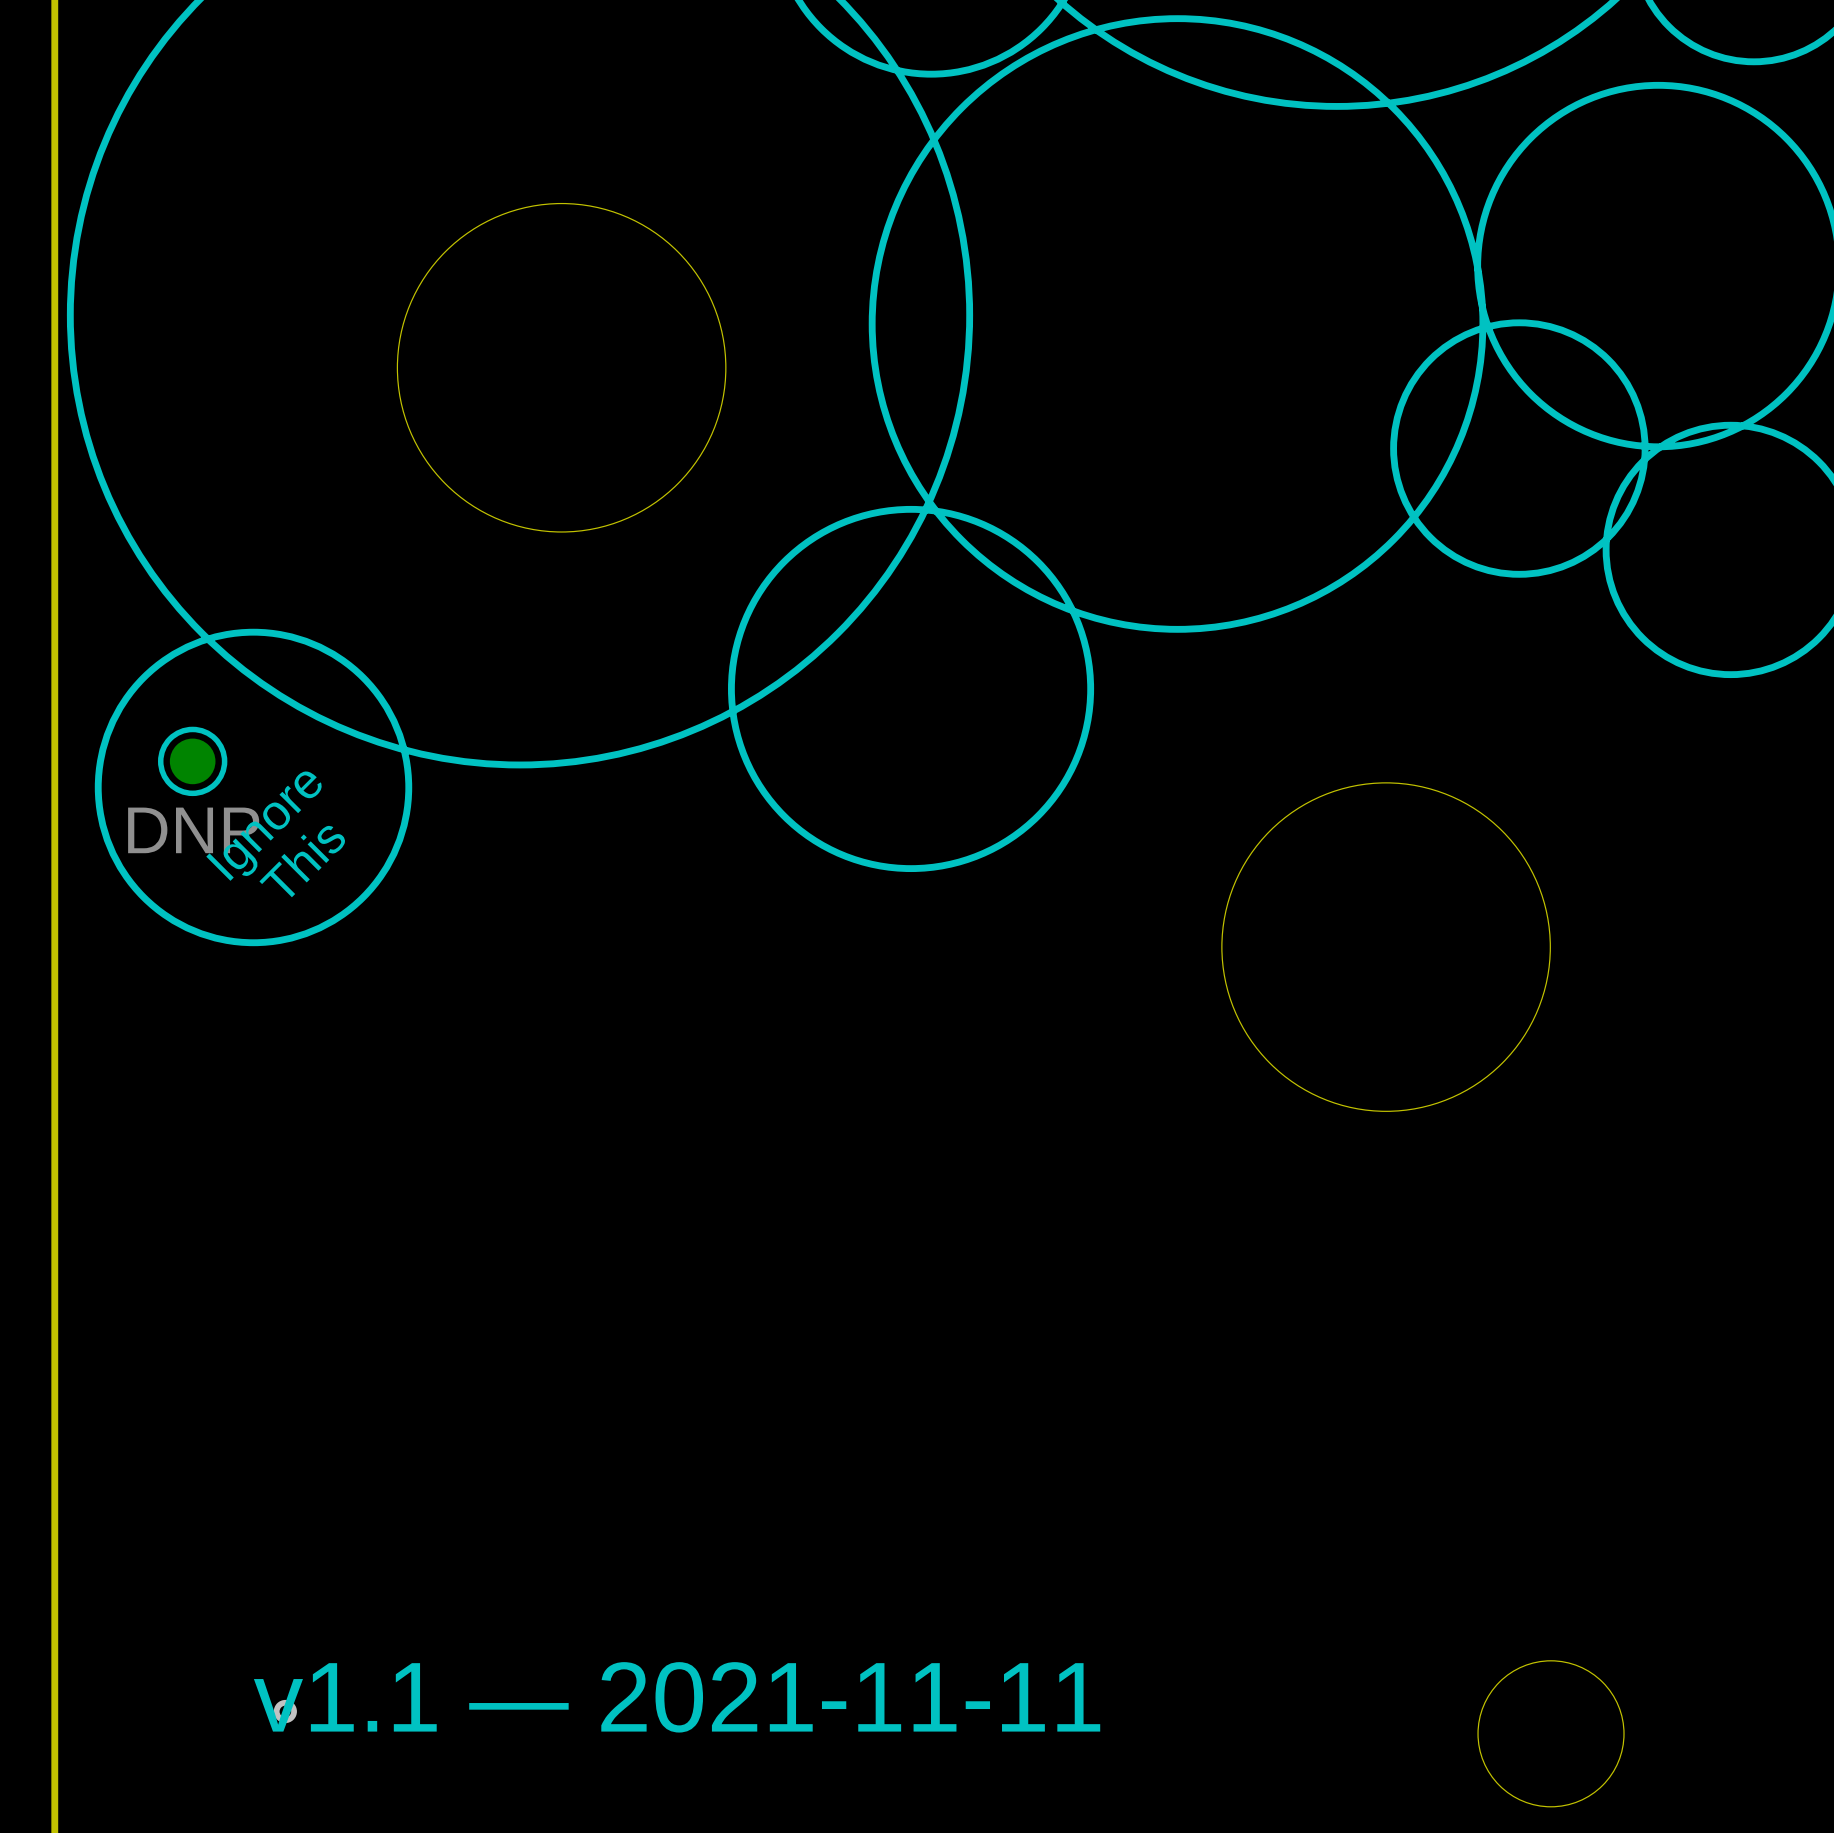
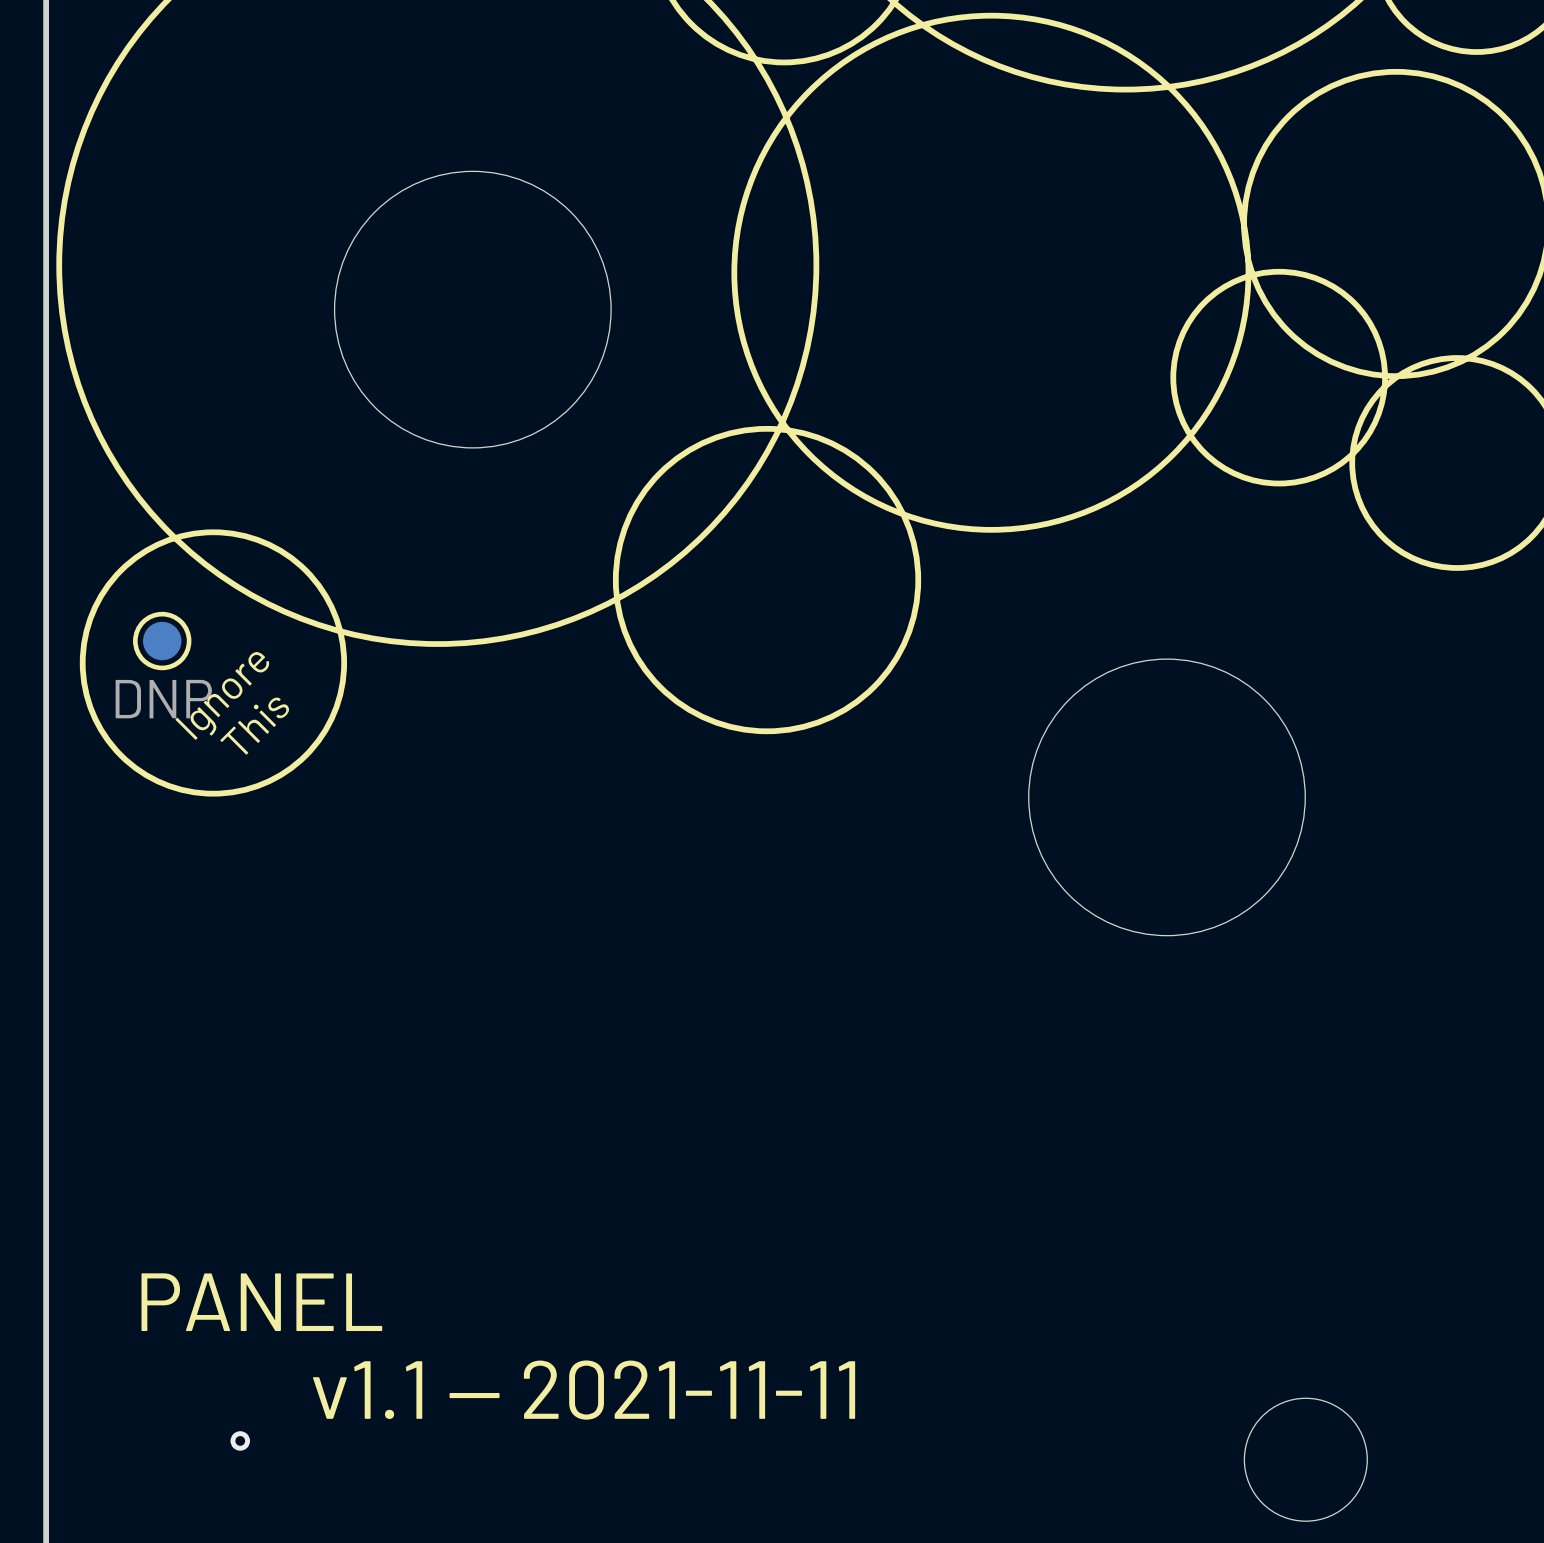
text: none -> PANEL (261, 1302)
text position: v1.1 — 2021-11-11 (677, 1697) -> v1.1 — 2021-11-11 (584, 1390)

